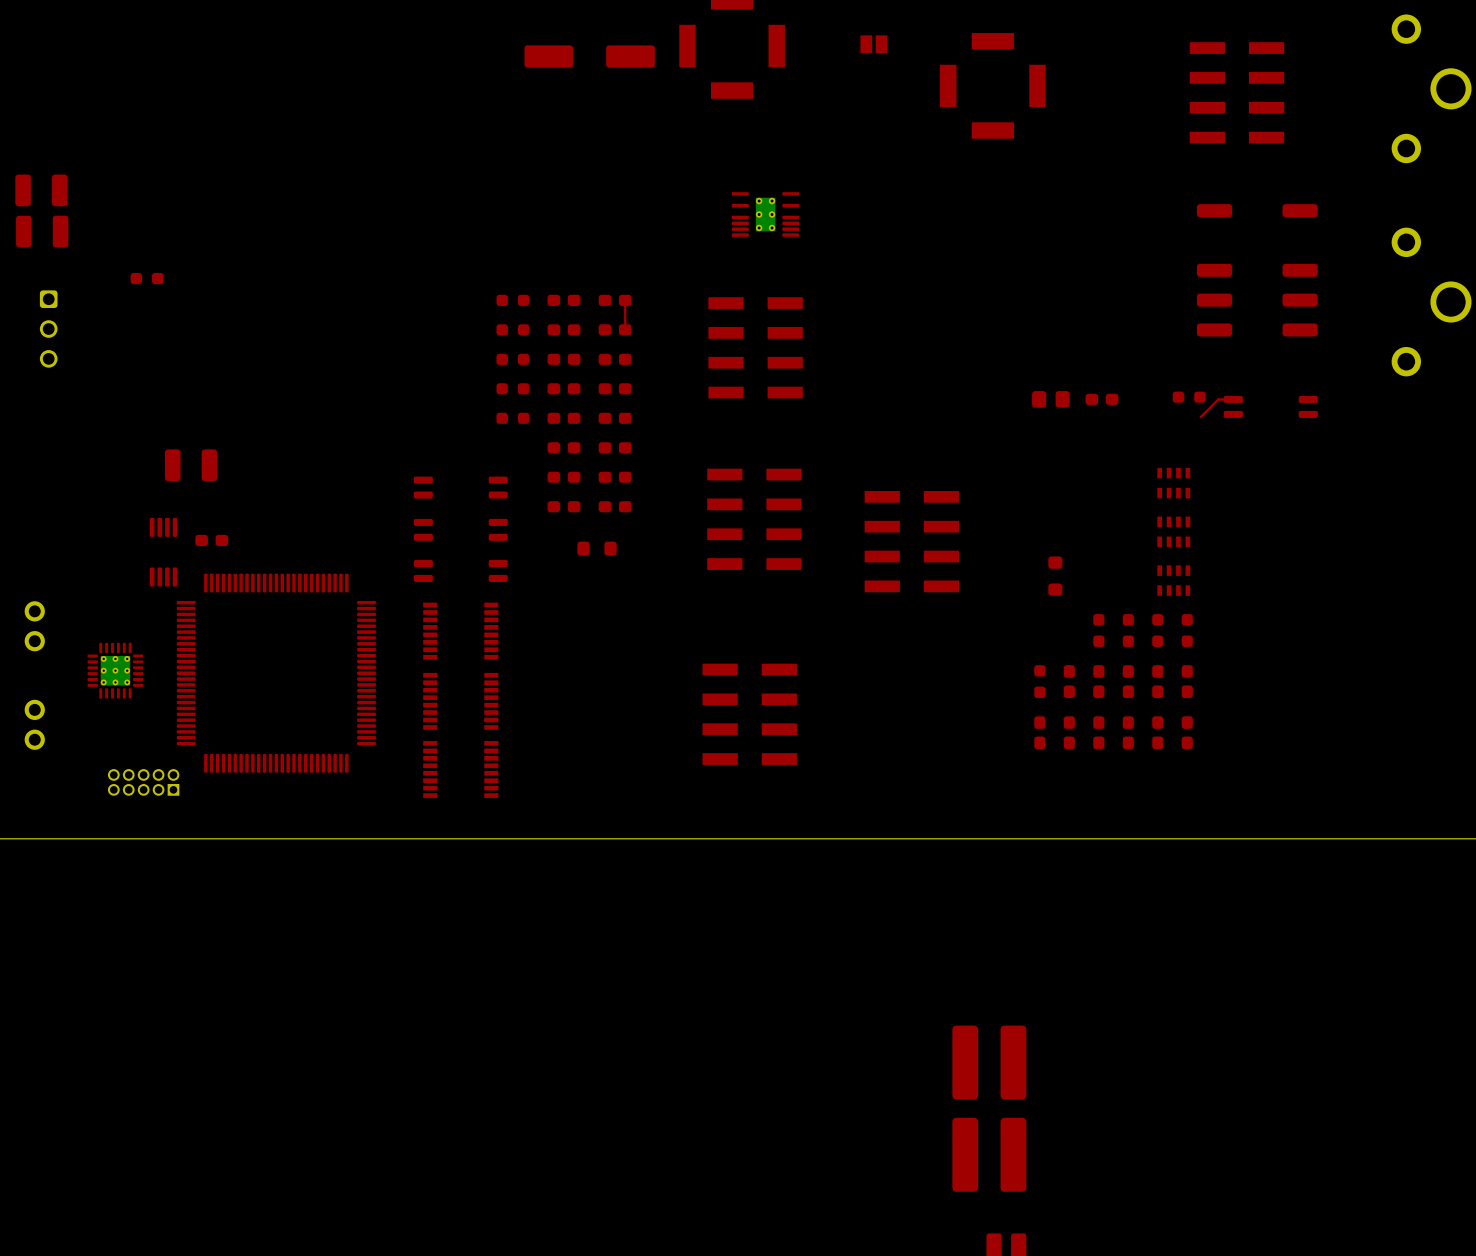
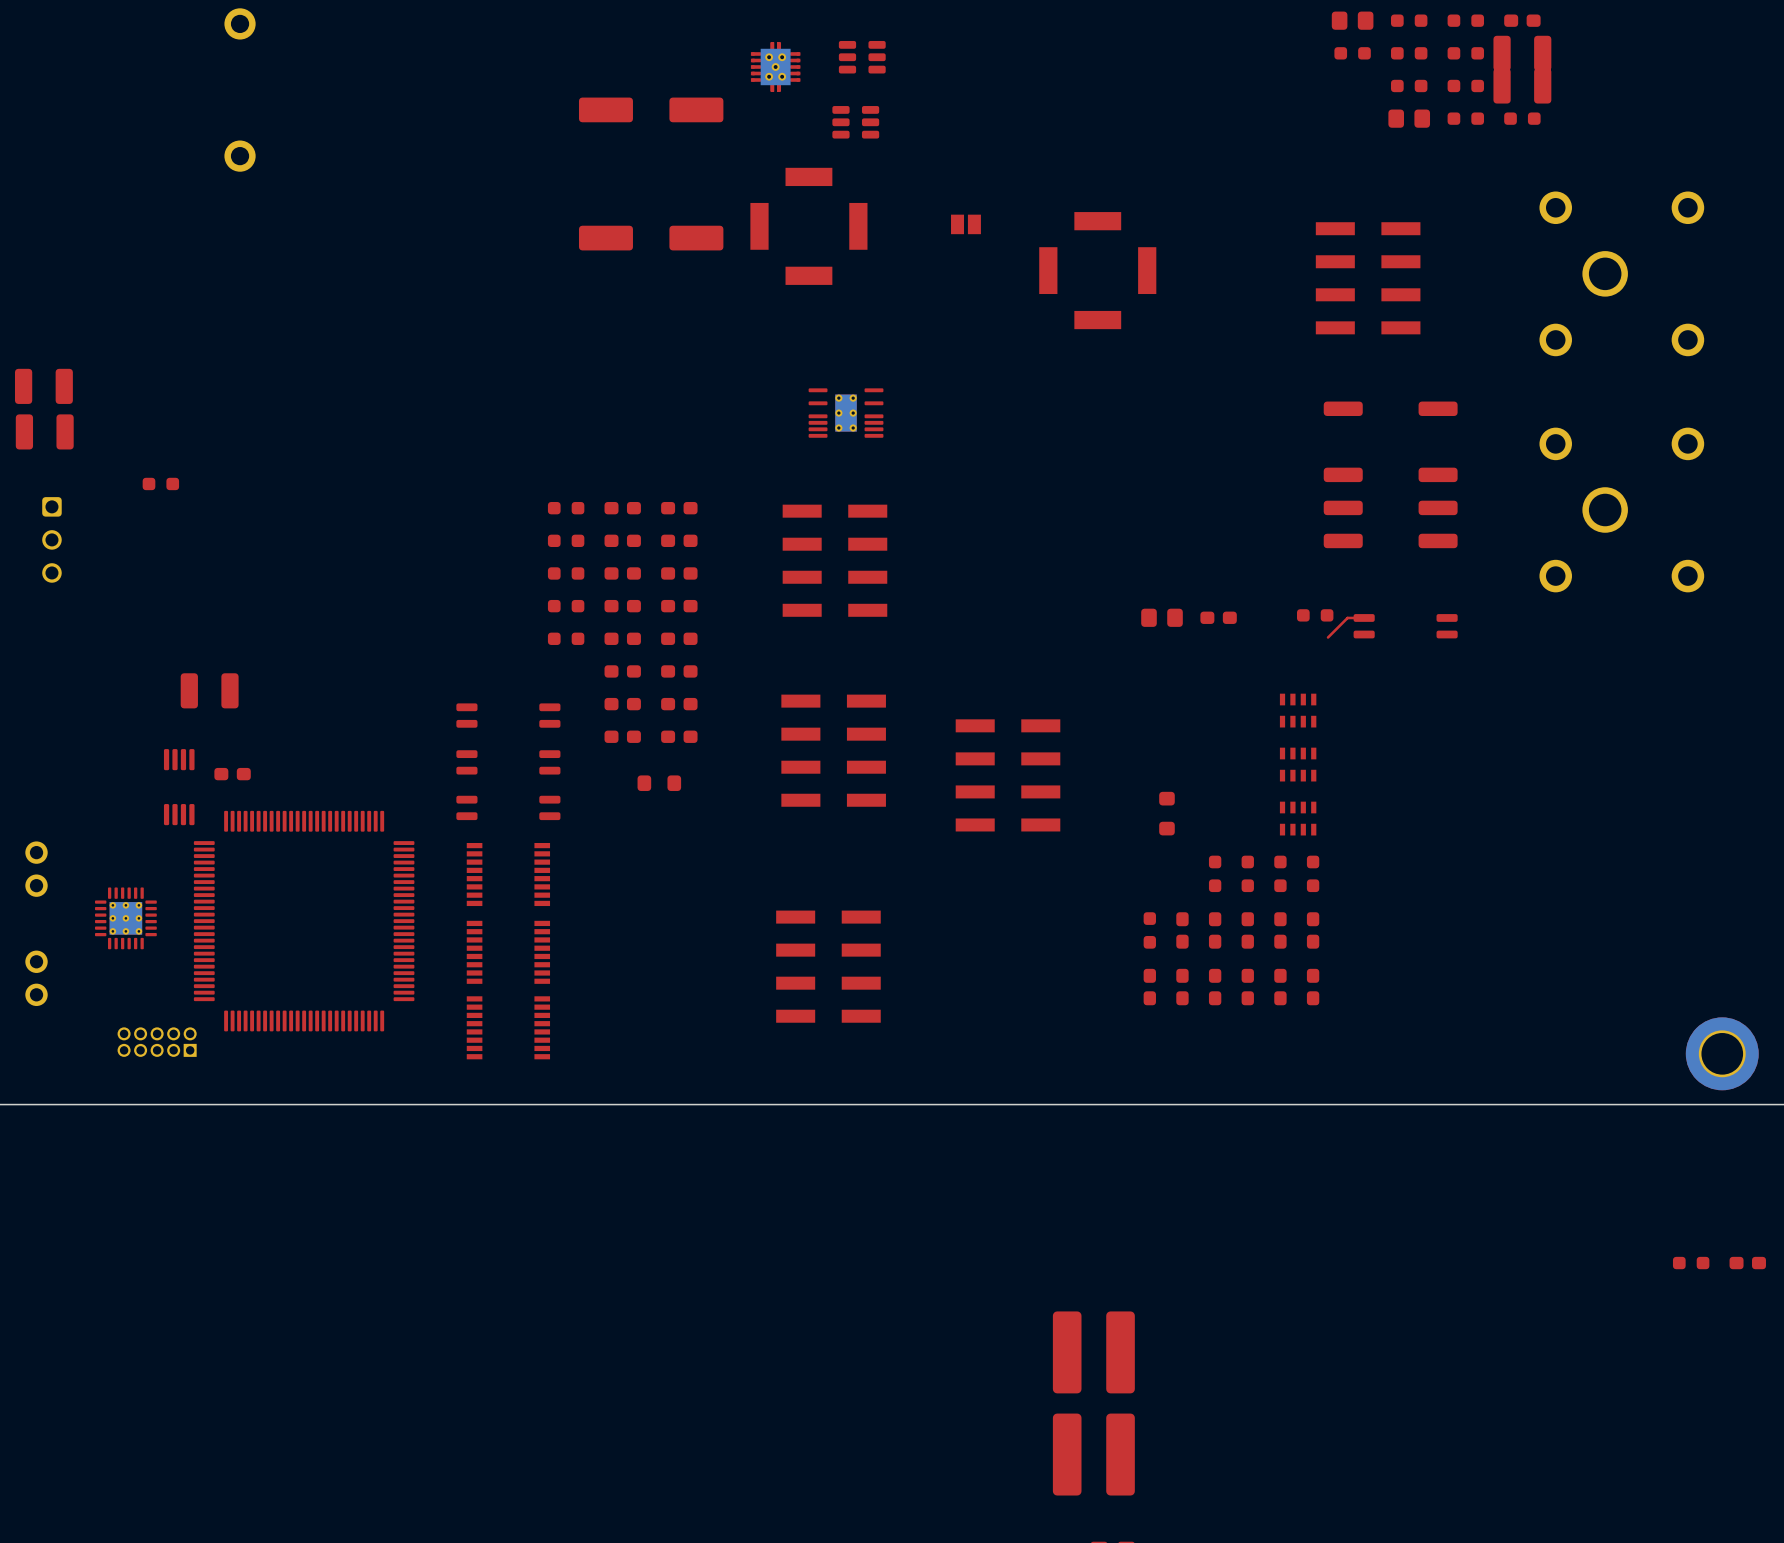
top track: (626, 298) (625, 329) -> none

